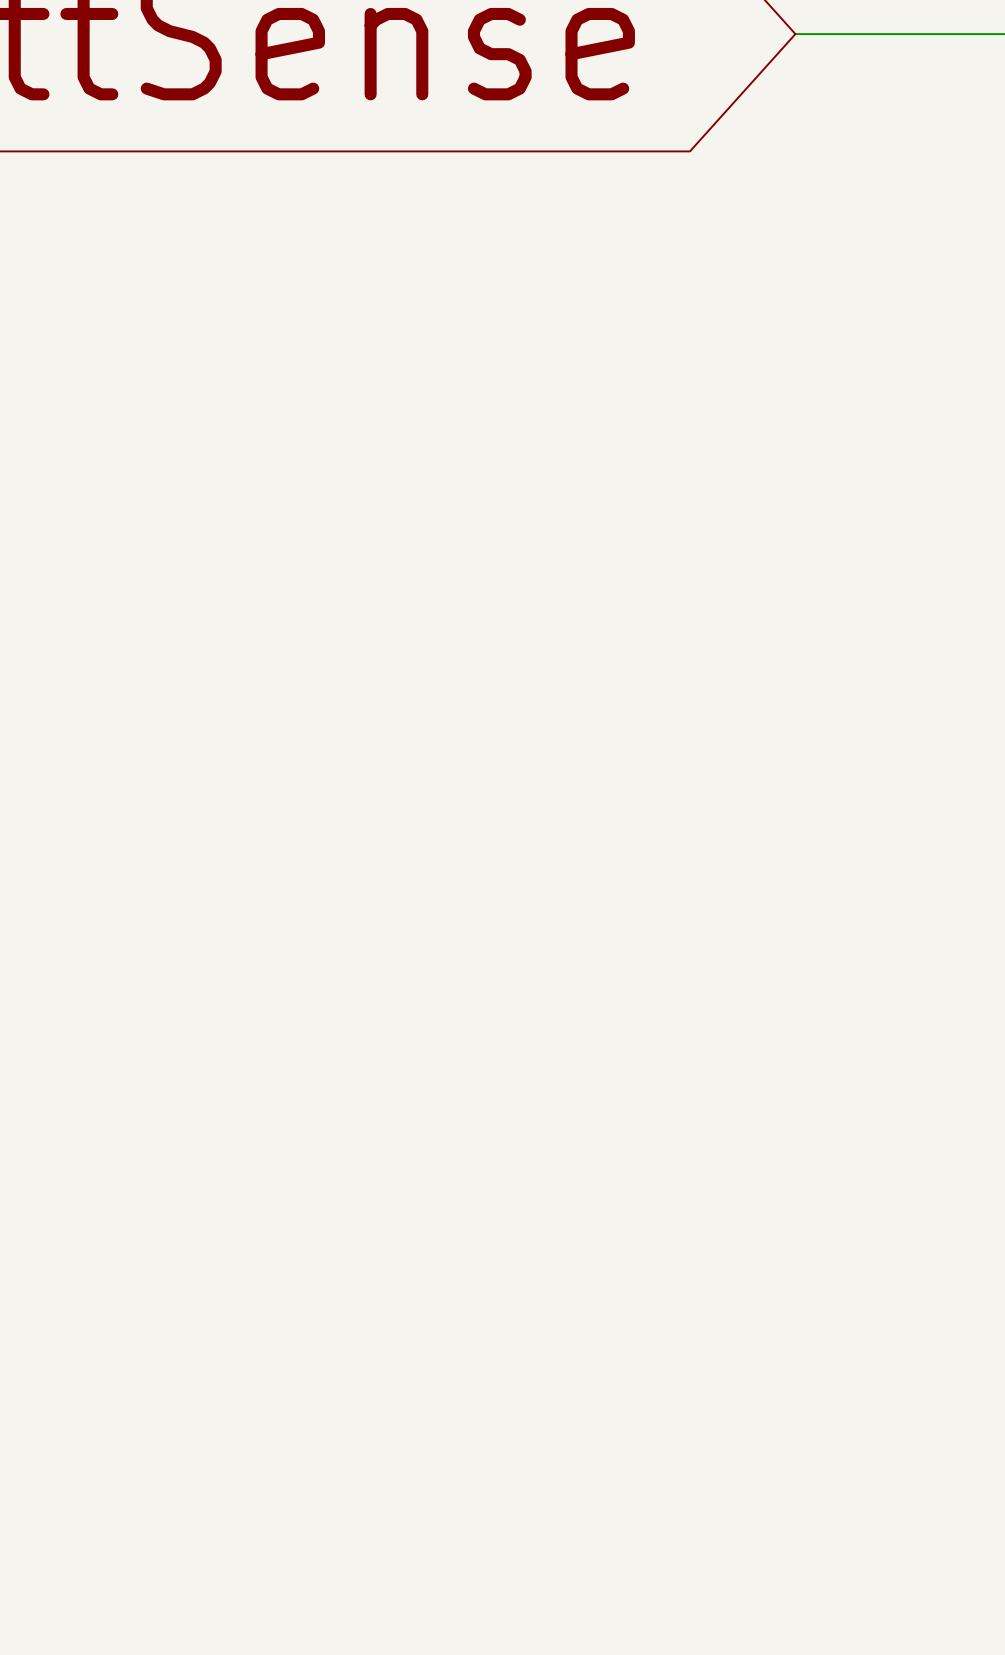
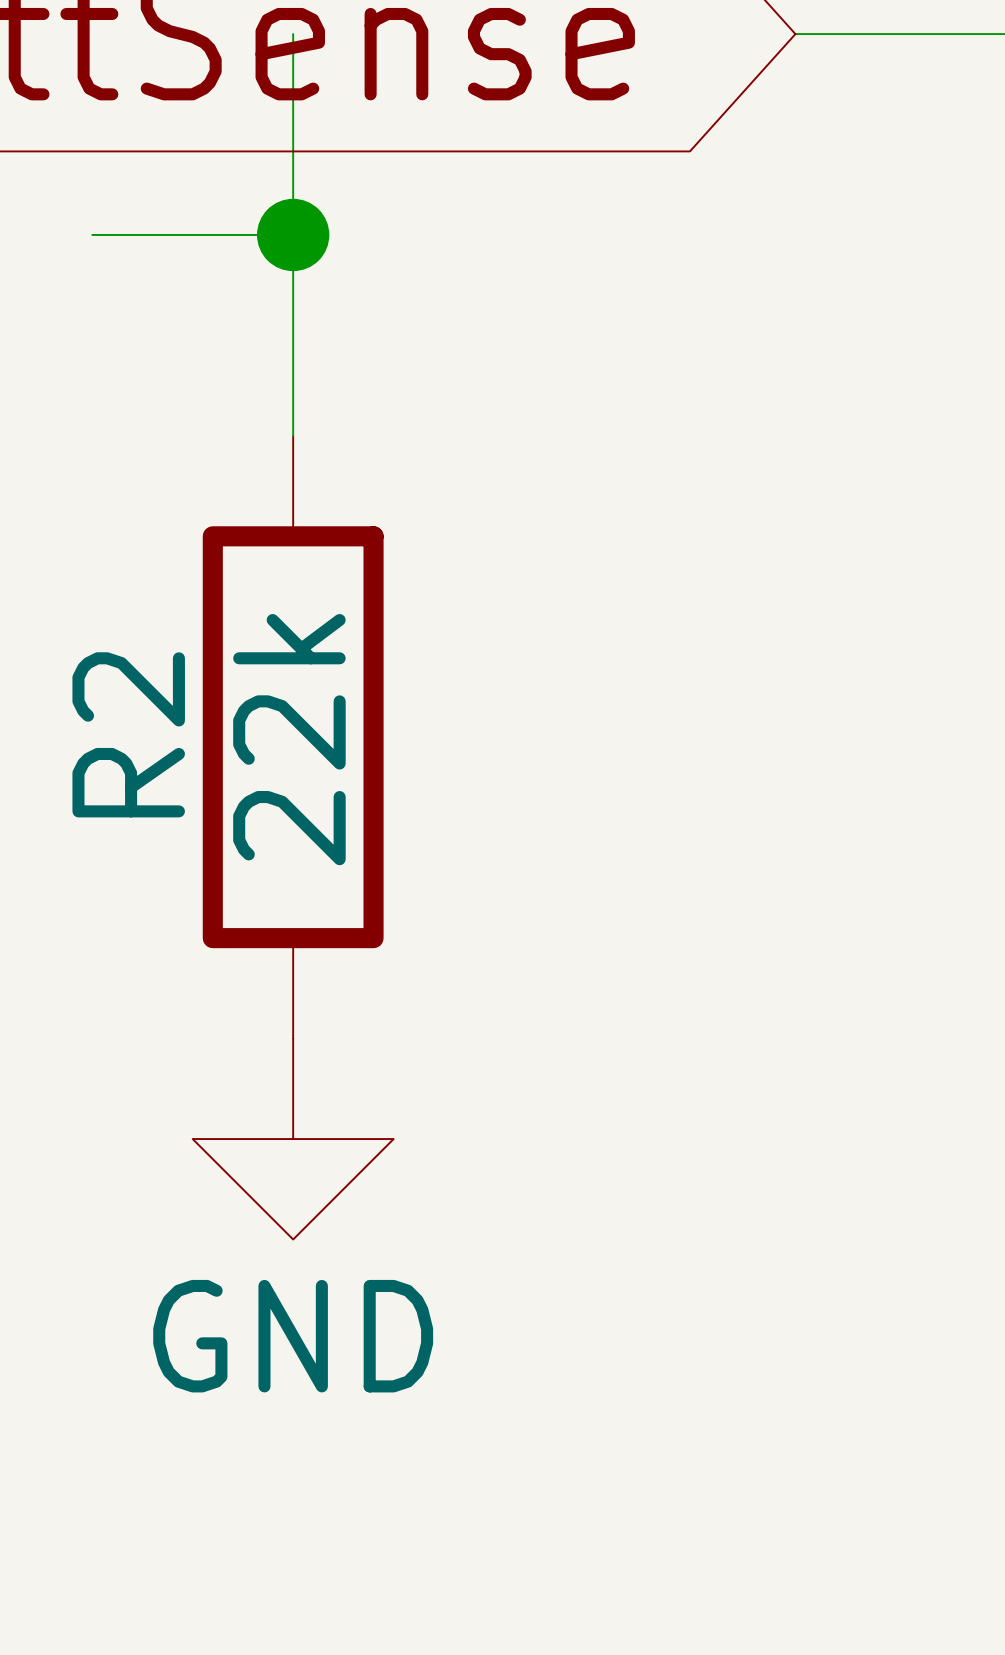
wire: none -> (293, 34) (293, 435)
wire: none -> (92, 234) (293, 234)
junction: none -> (293, 234)
R2: none -> 22k (293, 737)
power symbol: none -> GND (293, 1139)

